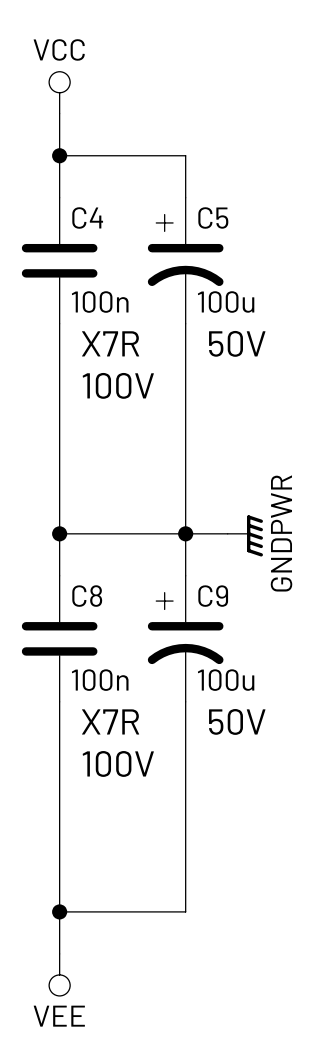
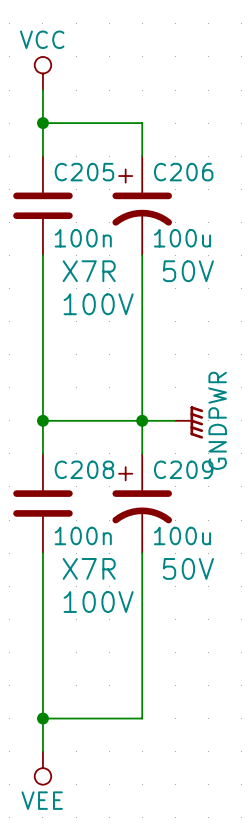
C4 name: C4 (87, 218) -> C205 (84, 172)
C5 name: C5 (213, 218) -> C206 (183, 172)
C8 name: C8 (87, 596) -> C208 (84, 469)
C9 name: C9 (213, 596) -> C209 (183, 469)

